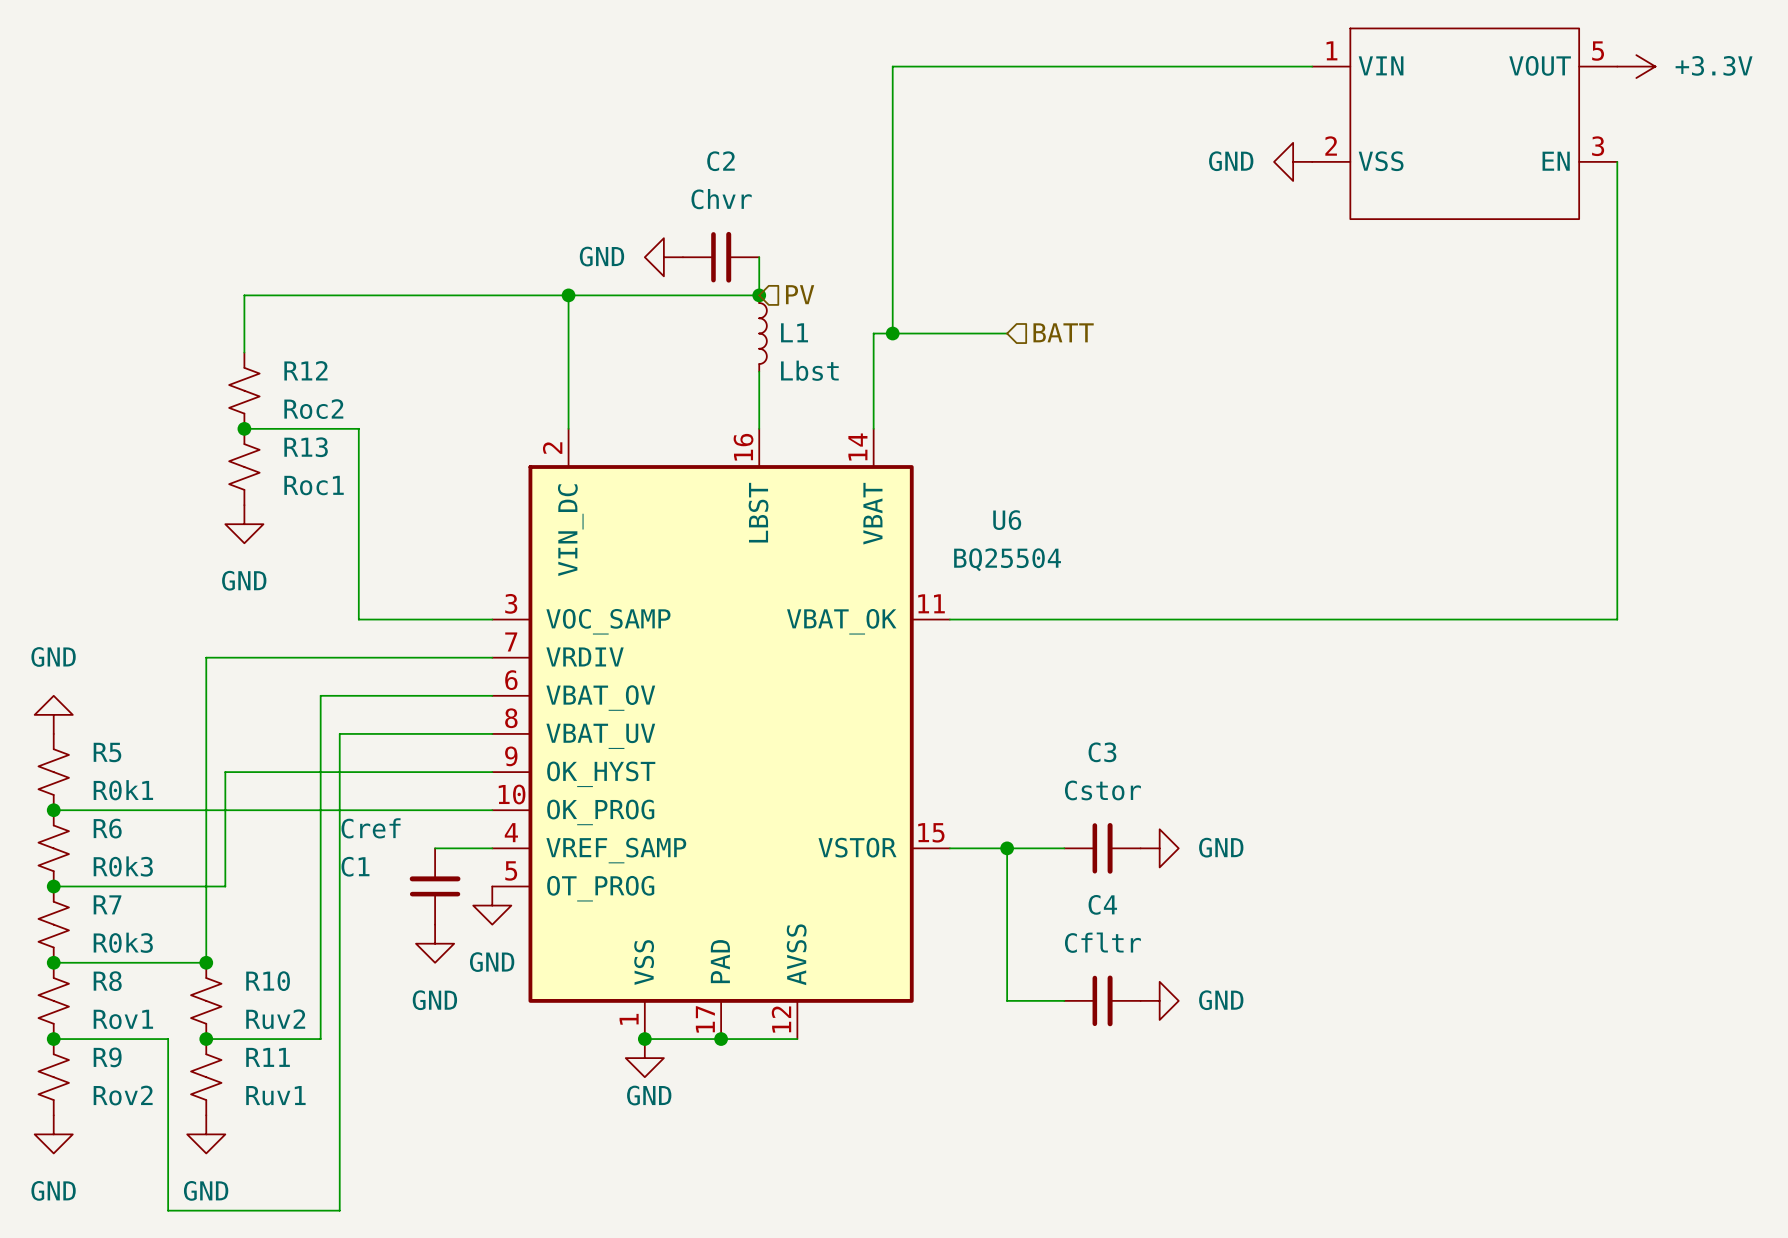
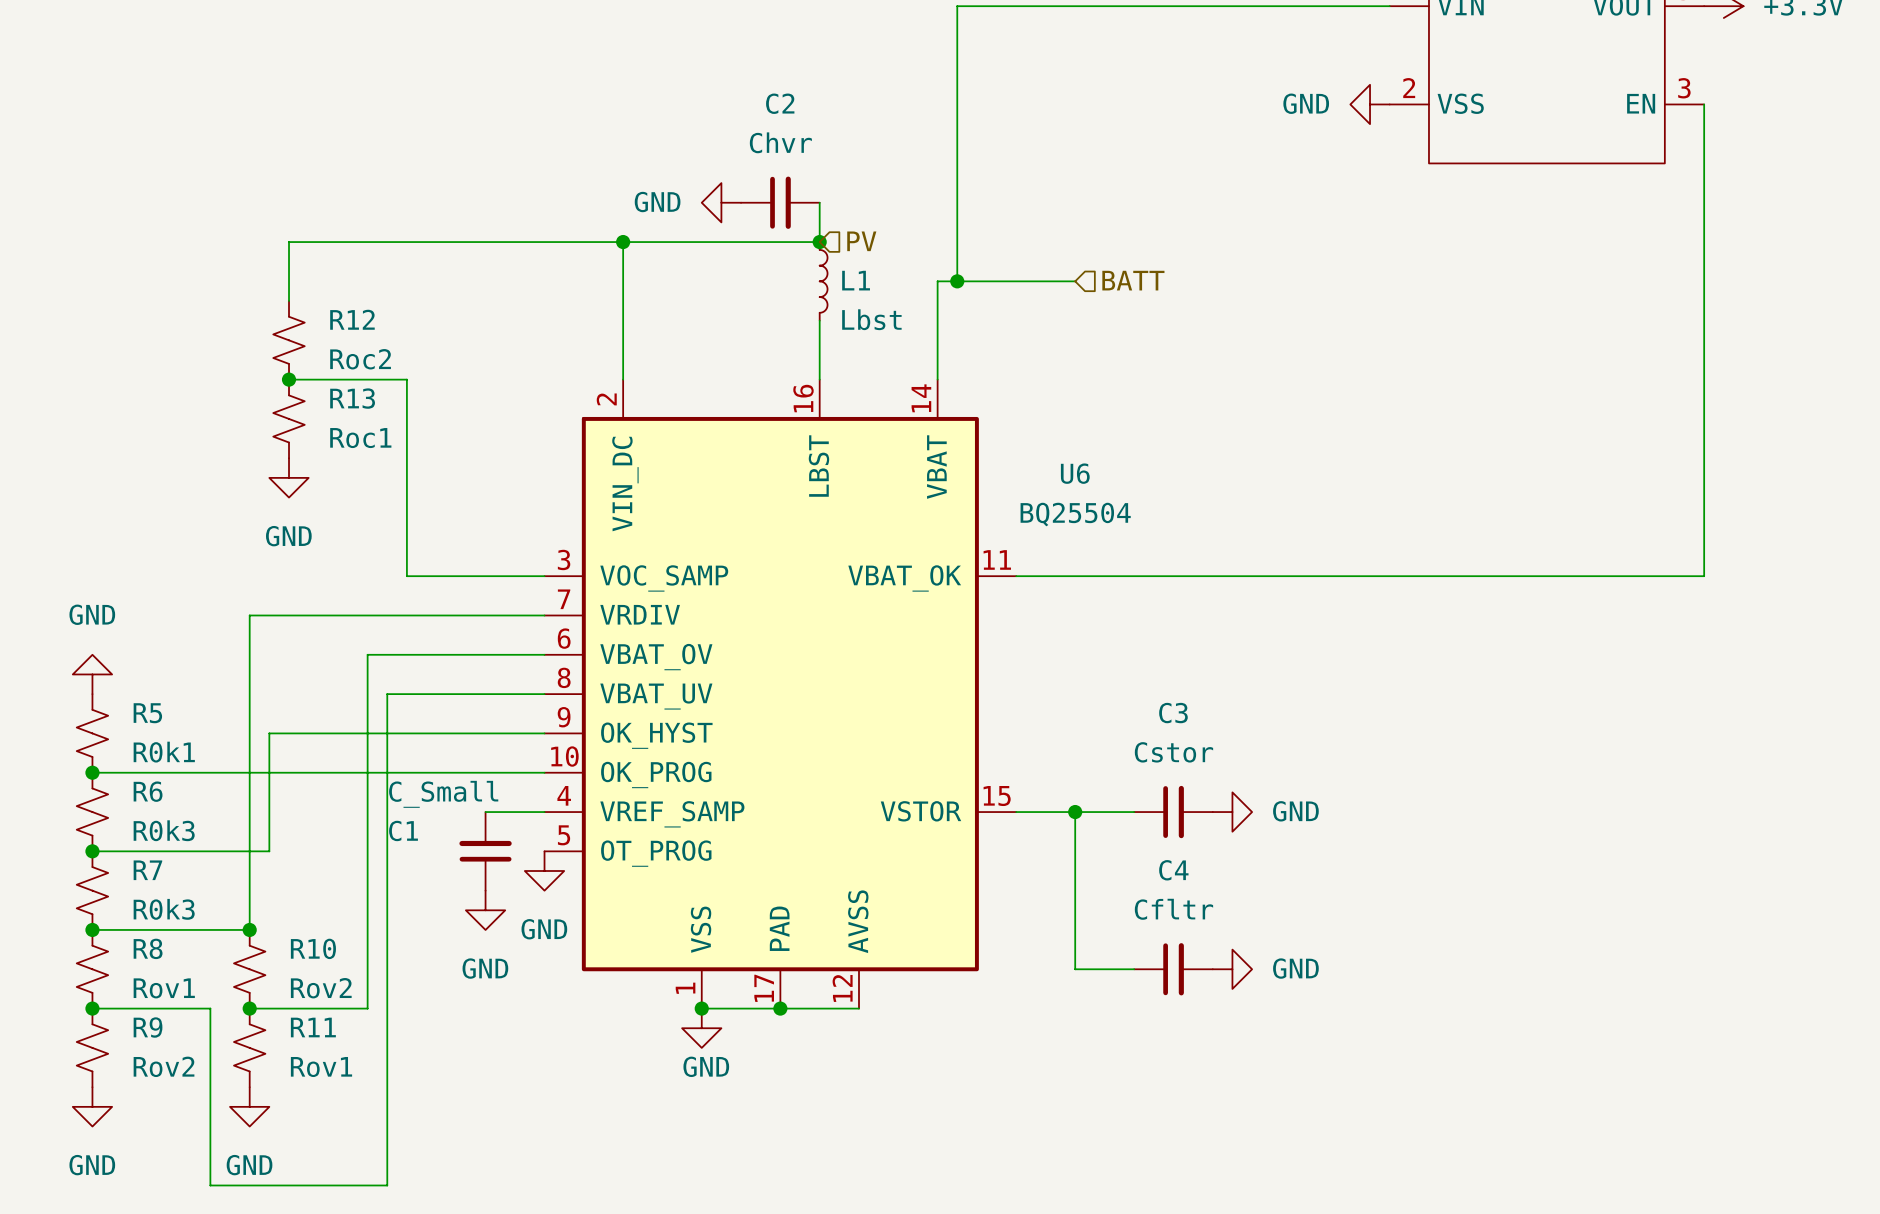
C1 value: Cref (371, 828) -> C_Small (443, 794)
R10 value: Ruv2 (275, 1019) -> Rov2 (321, 988)
R11 value: Ruv1 (275, 1095) -> Rov1 (321, 1067)

